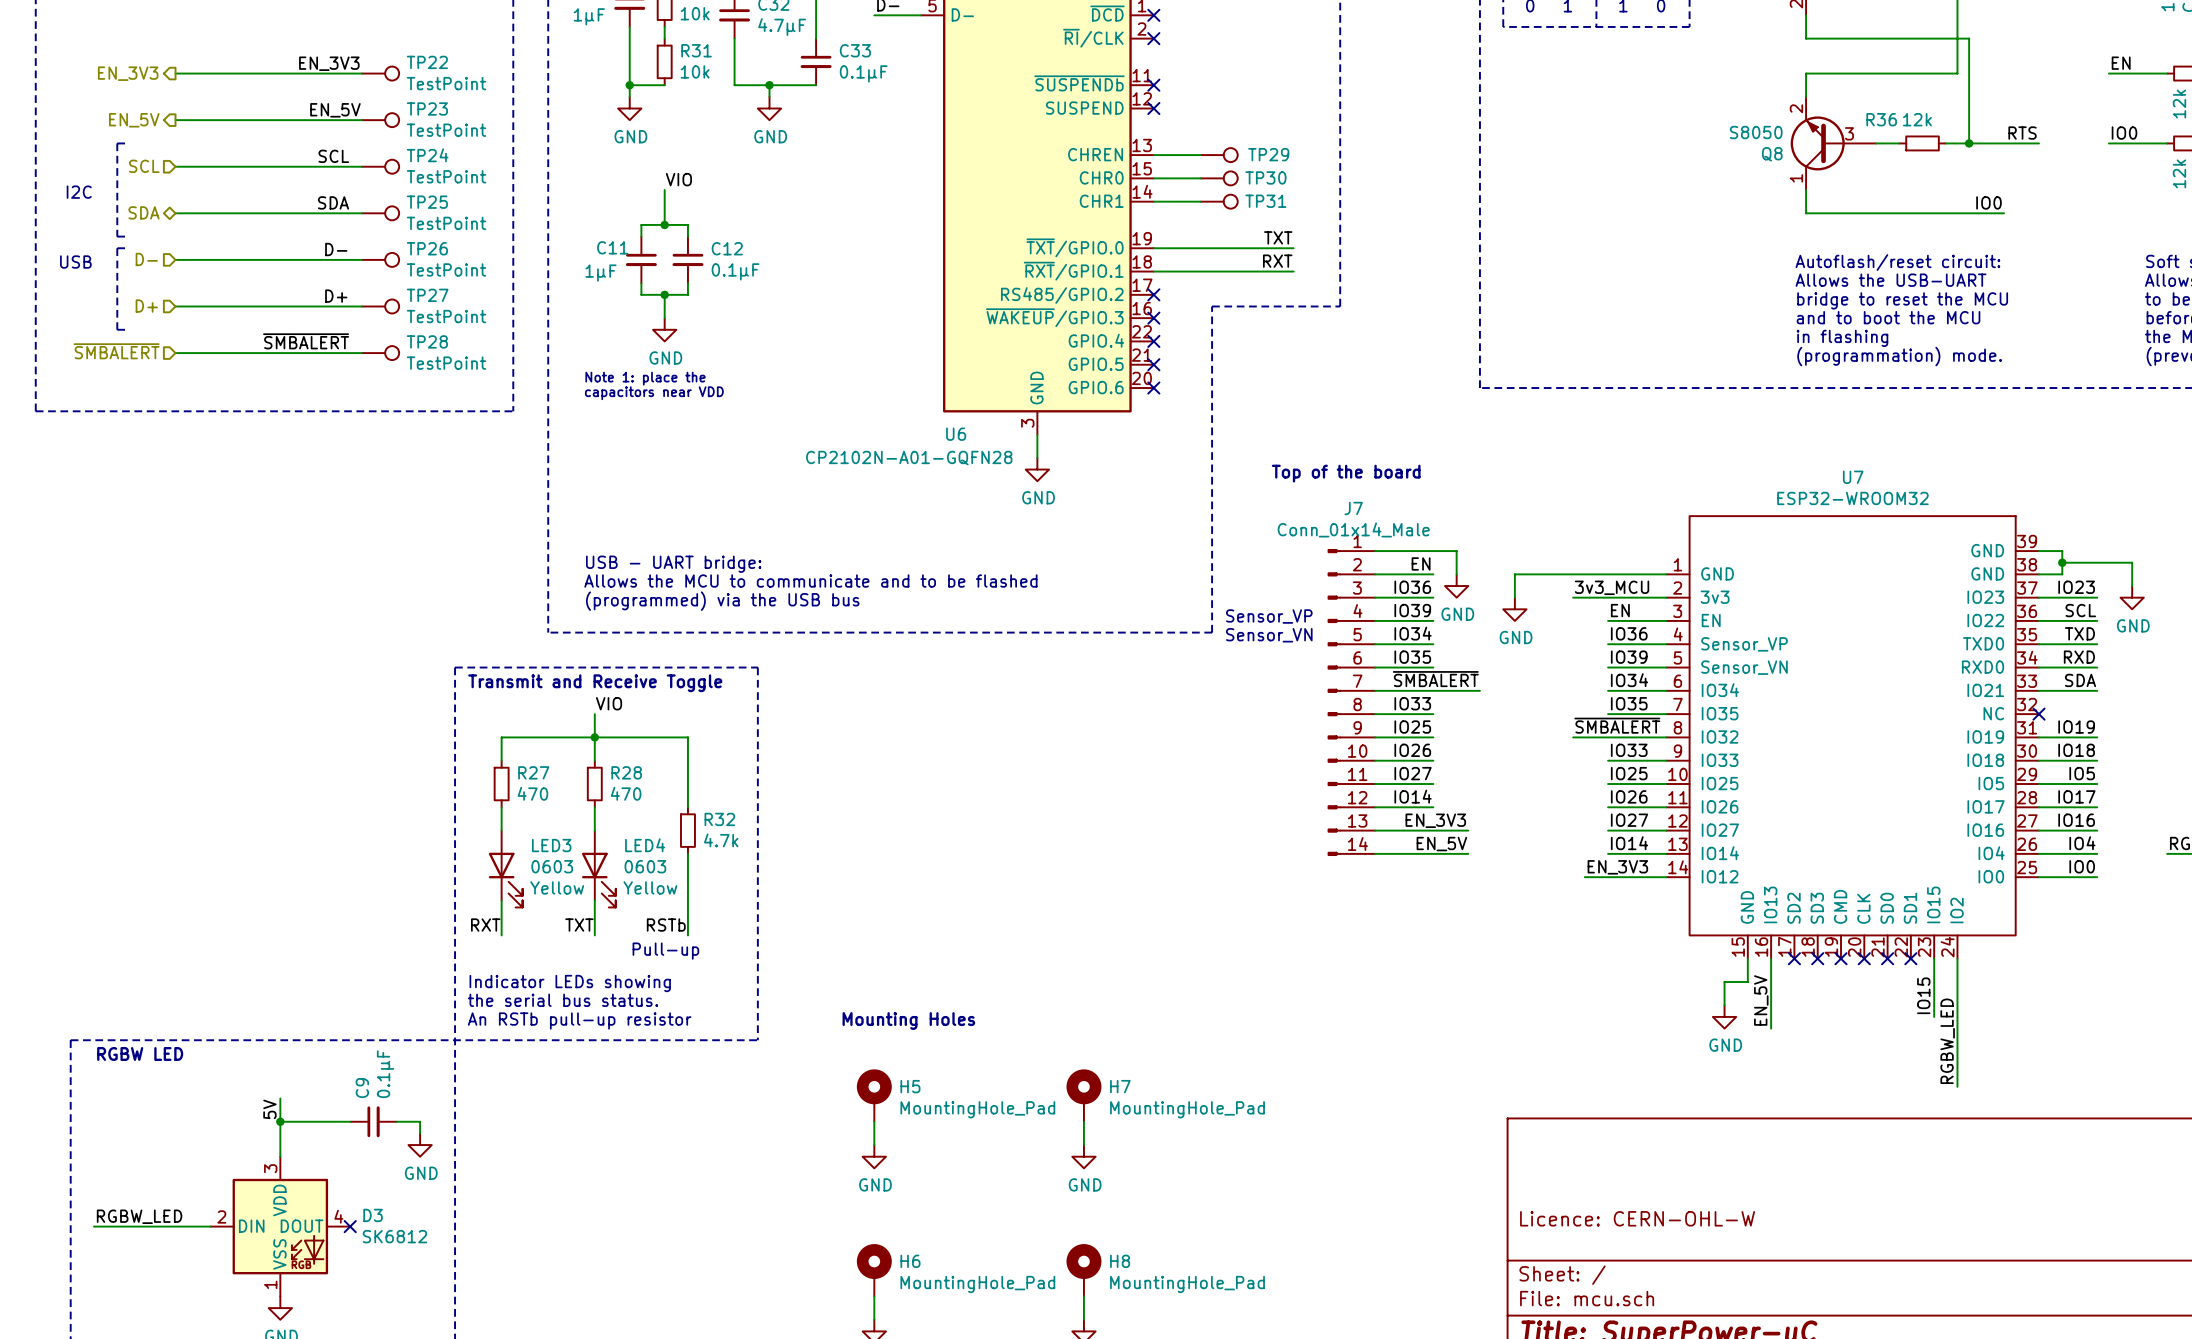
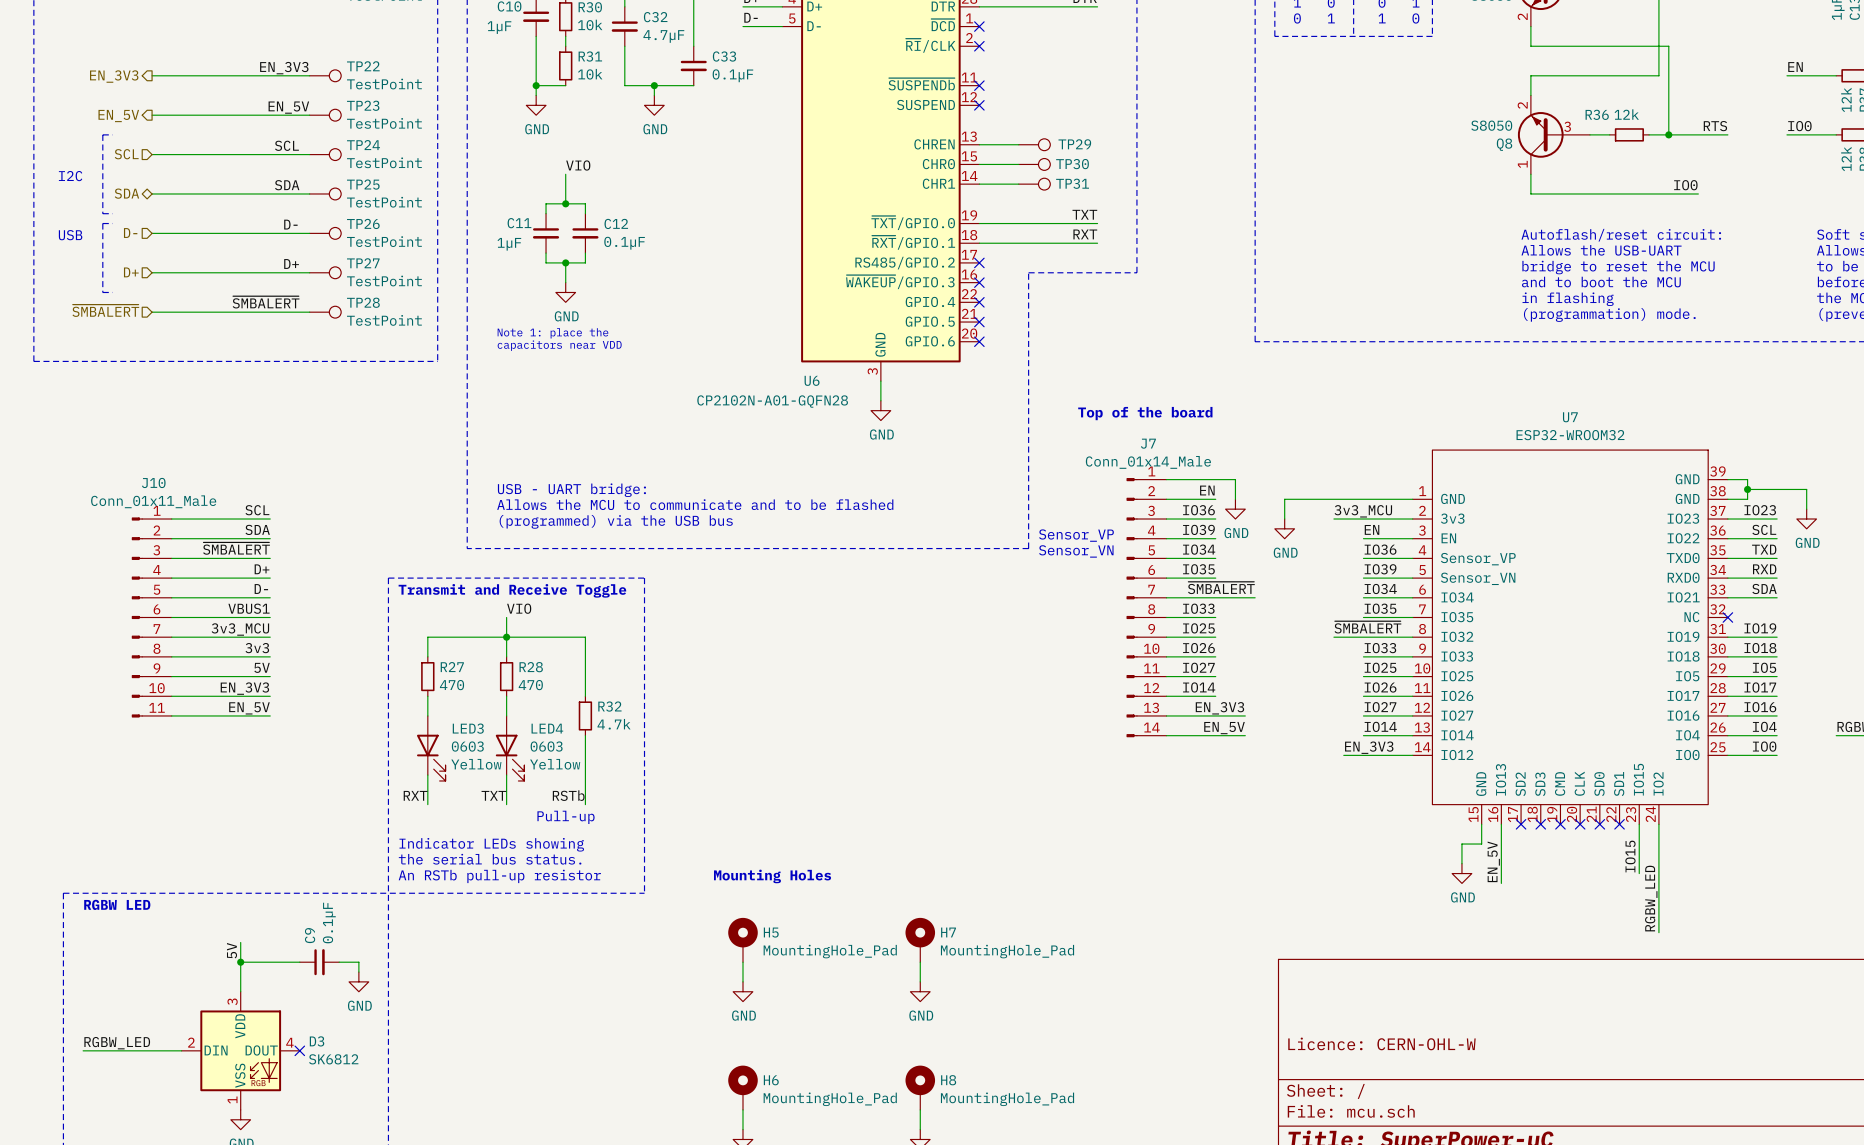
label: none -> SCL (257, 510)
wire: none -> (171, 519) (270, 519)
label: none -> SDA (257, 529)
wire: none -> (171, 538) (270, 538)
label: none -> ~{SMBALERT} (236, 548)
wire: none -> (171, 558) (270, 558)
label: none -> D+ (262, 569)
wire: none -> (171, 578) (270, 578)
label: none -> D- (261, 589)
wire: none -> (171, 597) (270, 597)
label: none -> VBUS1 (249, 608)
J10: none -> Conn_01x11_Male (151, 617)
wire: none -> (171, 617) (270, 617)
label: none -> 3v3_MCU (240, 629)
wire: none -> (171, 637) (270, 637)
label: none -> 3v3 (257, 648)
wire: none -> (171, 656) (270, 656)
label: none -> 5V (262, 667)
wire: none -> (171, 676) (270, 676)
label: none -> EN_3V3 (244, 688)
wire: none -> (171, 696) (270, 696)
label: none -> EN_5V (249, 708)
wire: none -> (171, 715) (270, 715)

